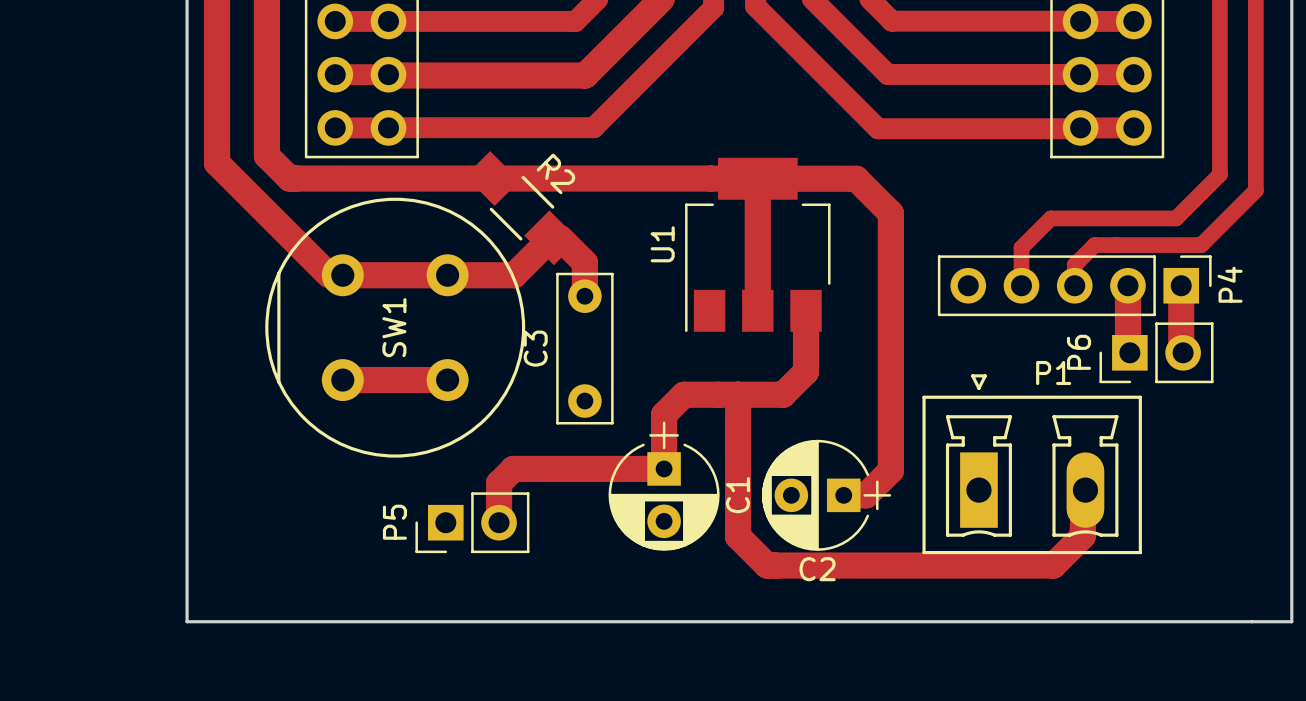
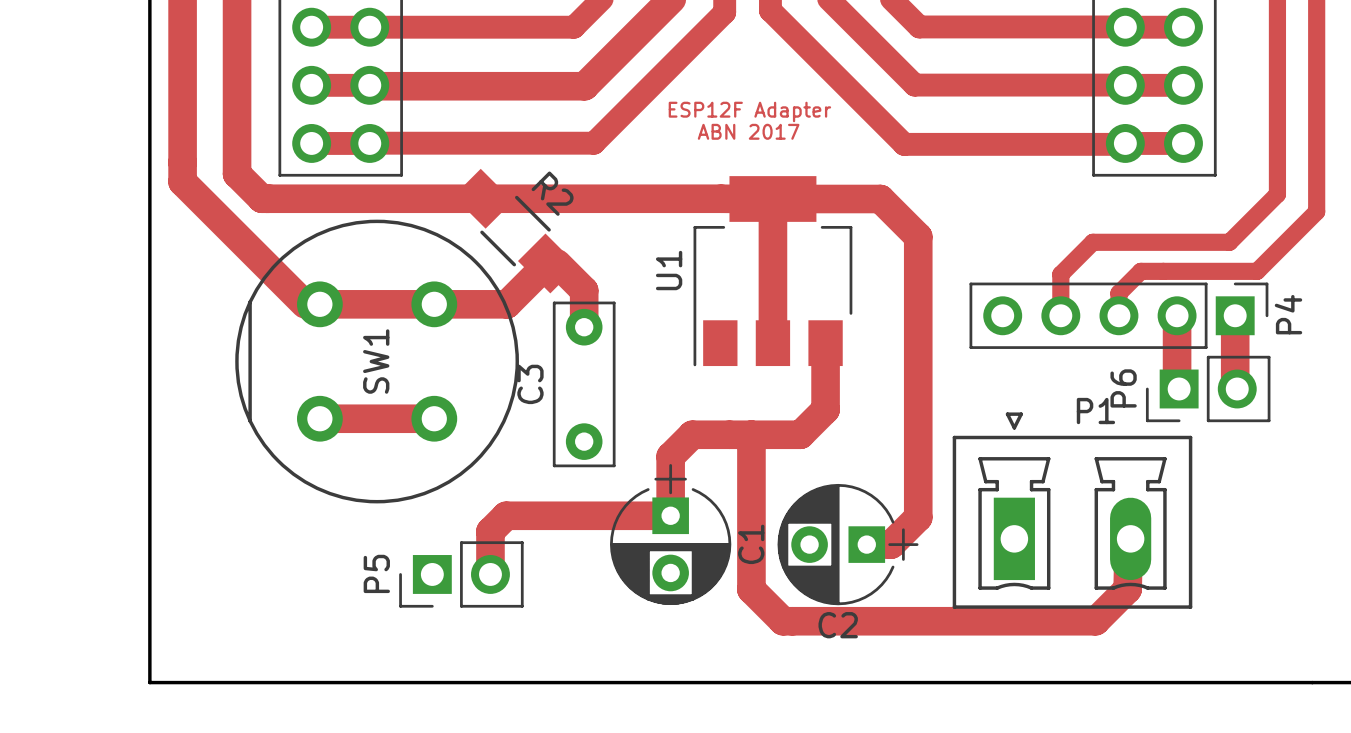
text: none -> ESP12F Adapter (749, 111)
text: none -> ABN 2017 (748, 131)

